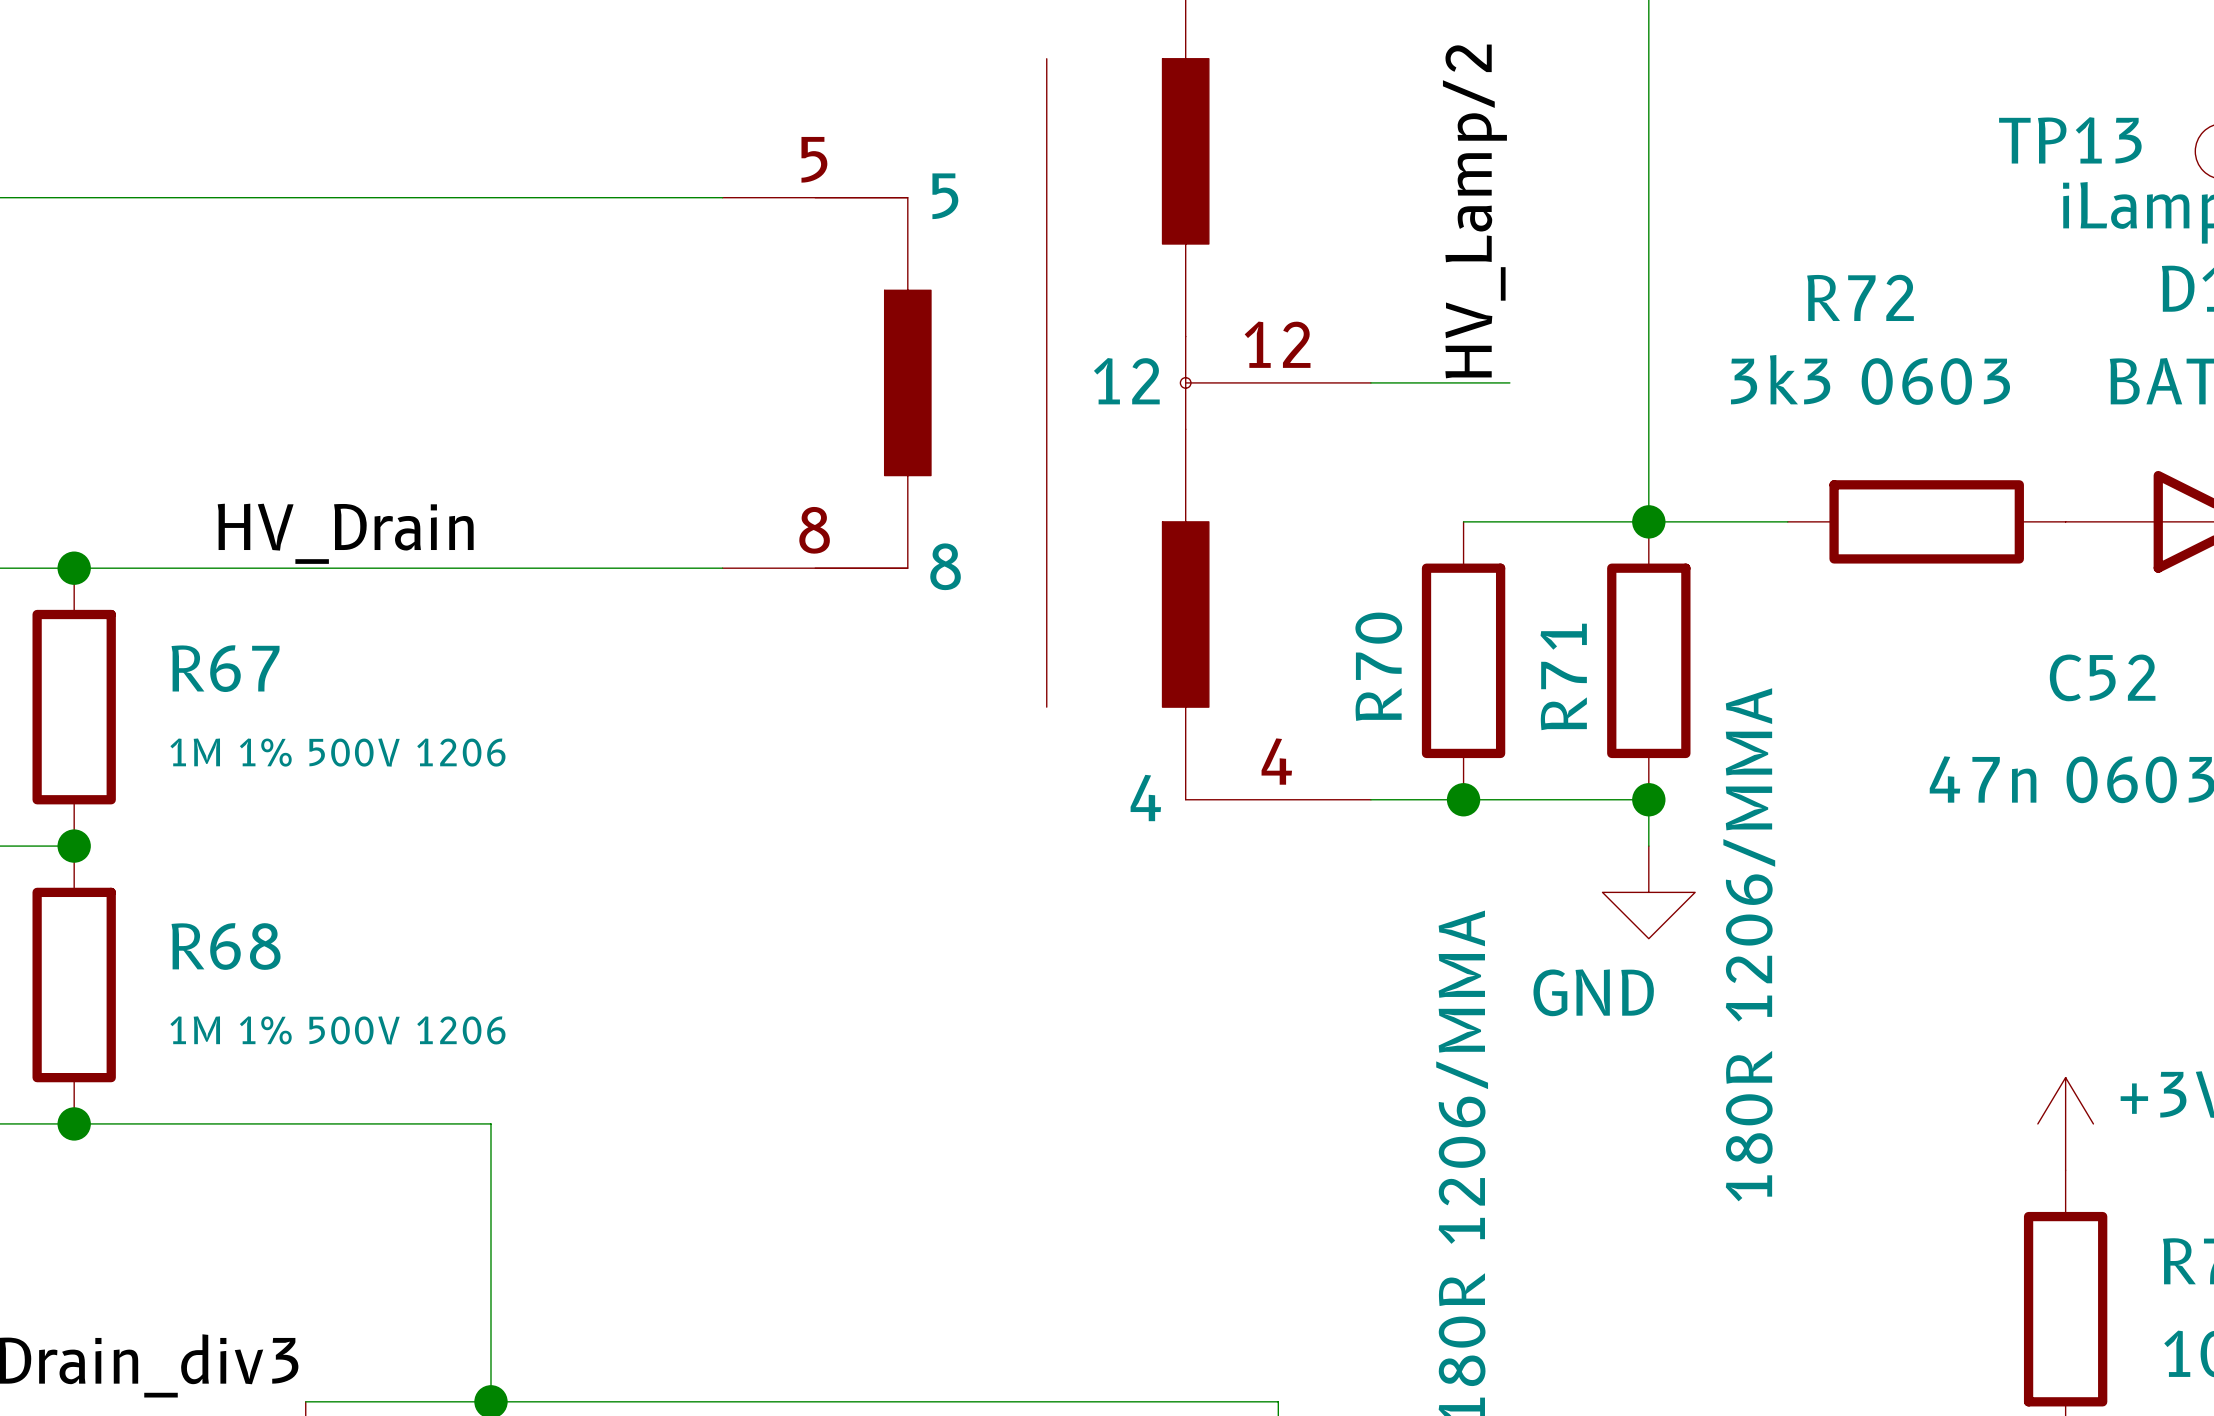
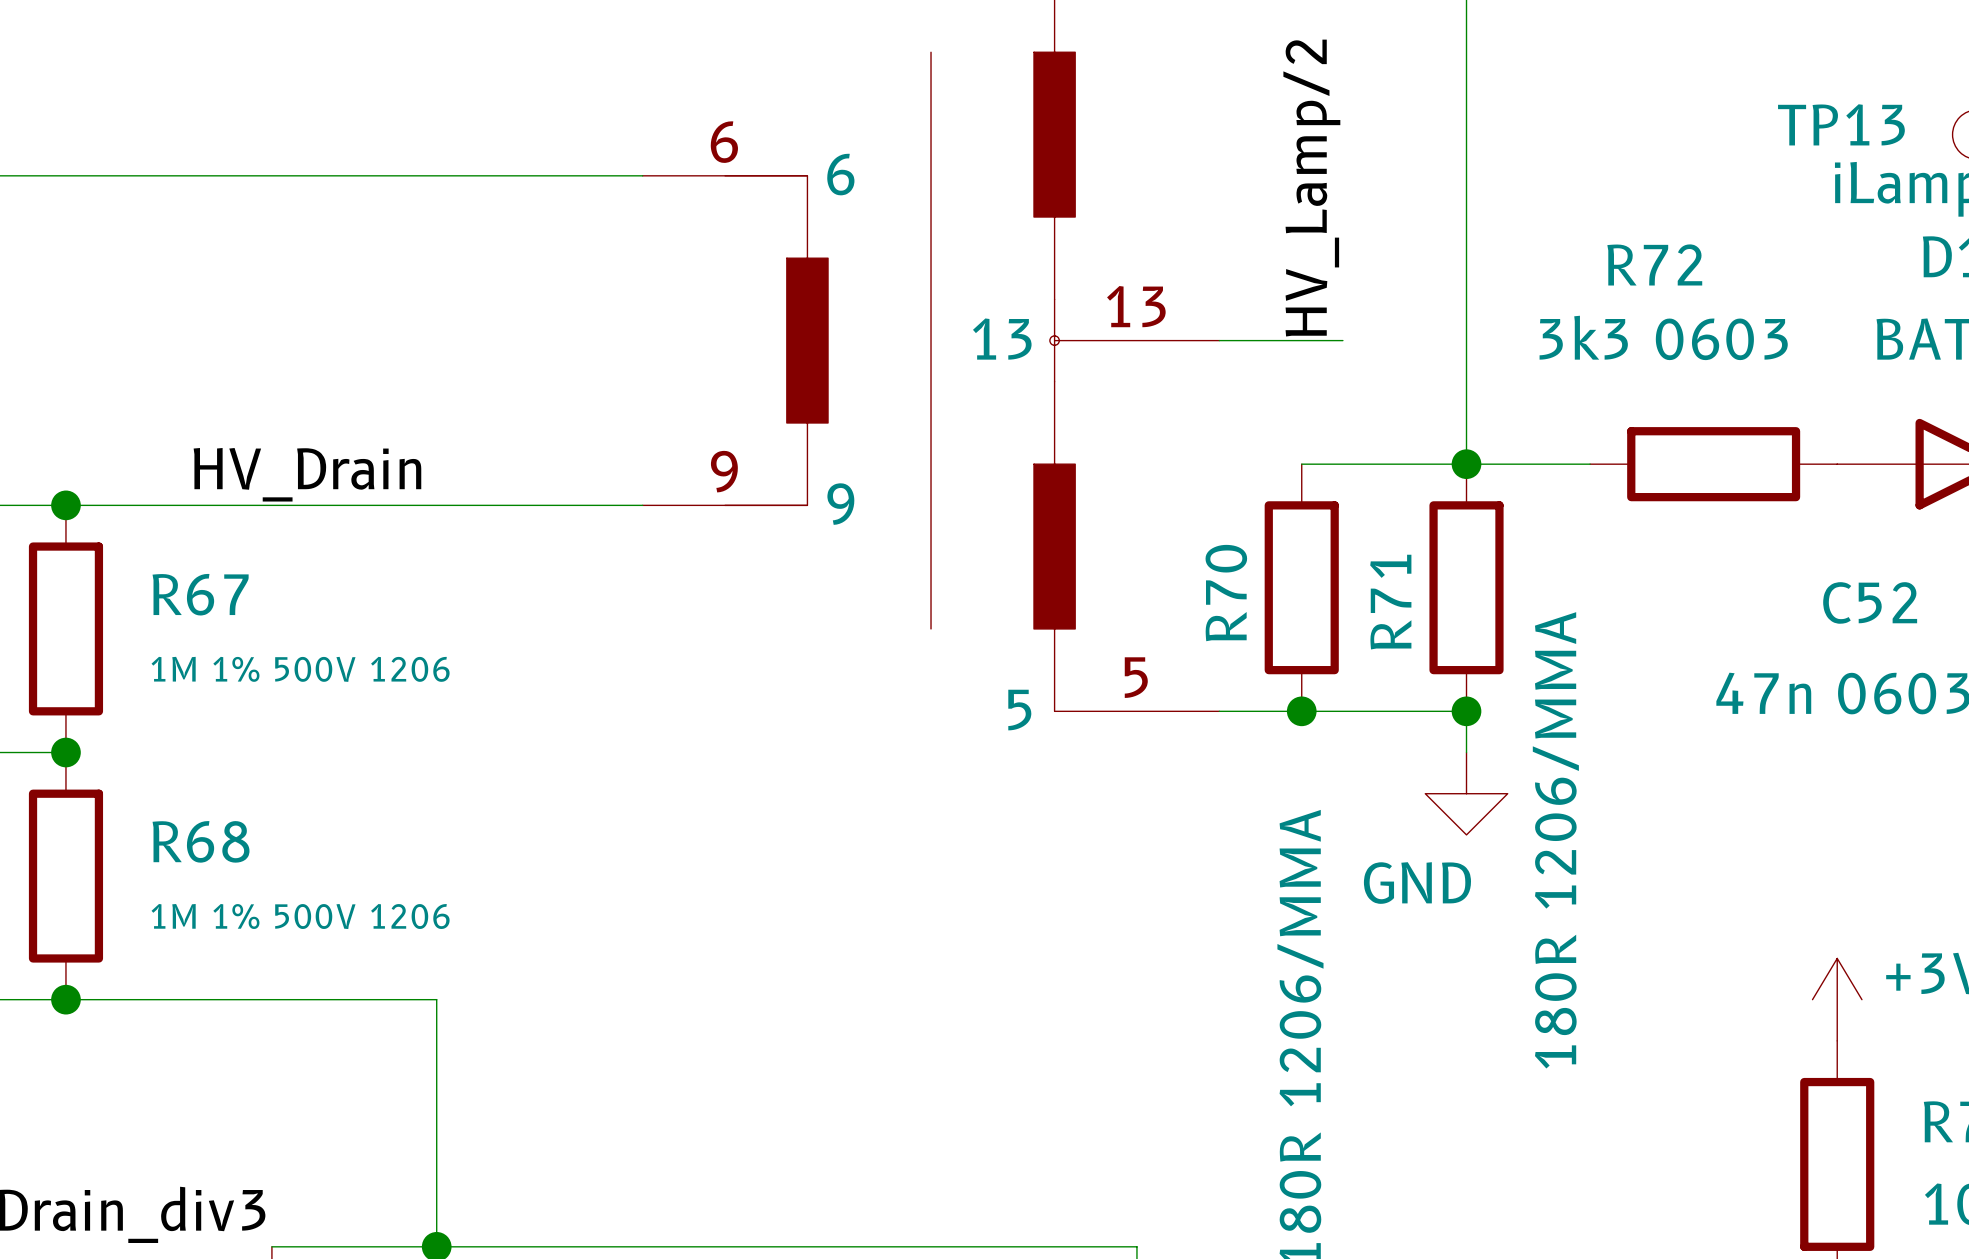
part pin number: 5 (814, 159) -> 6 (724, 142)
part pin name: 5 (945, 196) -> 6 (840, 174)
part pin number: 12 (1277, 344) -> 13 (1136, 306)
part pin name: 12 (1126, 381) -> 13 (1002, 339)
part pin number: 8 (814, 530) -> 9 (724, 471)
part pin name: 8 (945, 566) -> 9 (840, 504)
part pin number: 4 (1276, 761) -> 5 (1136, 677)
part pin name: 4 (1145, 798) -> 5 (1019, 710)

